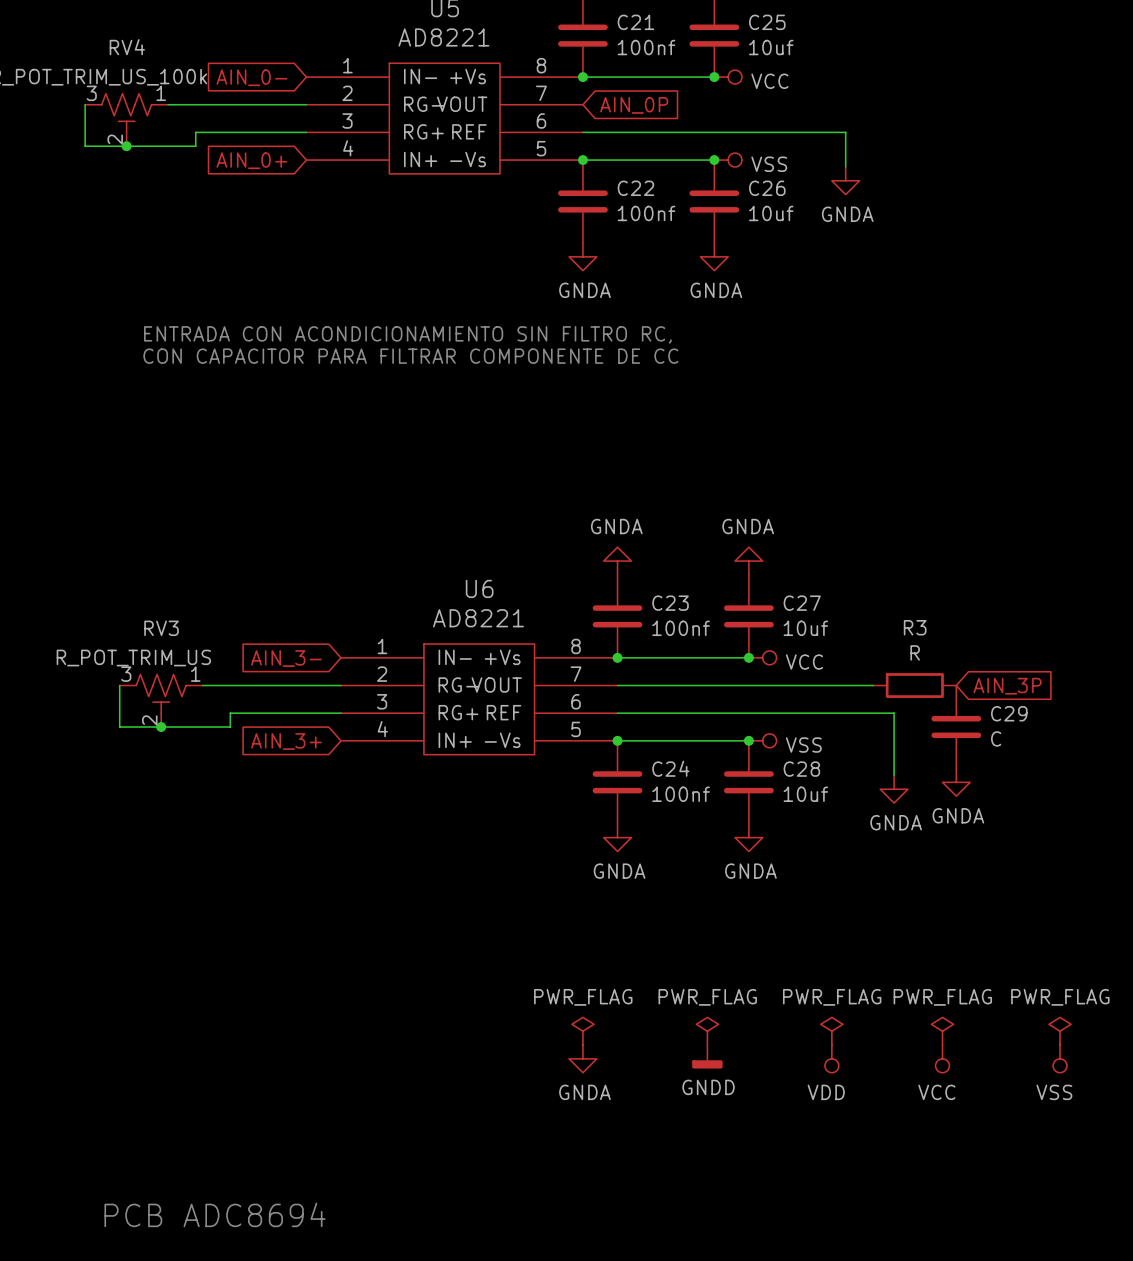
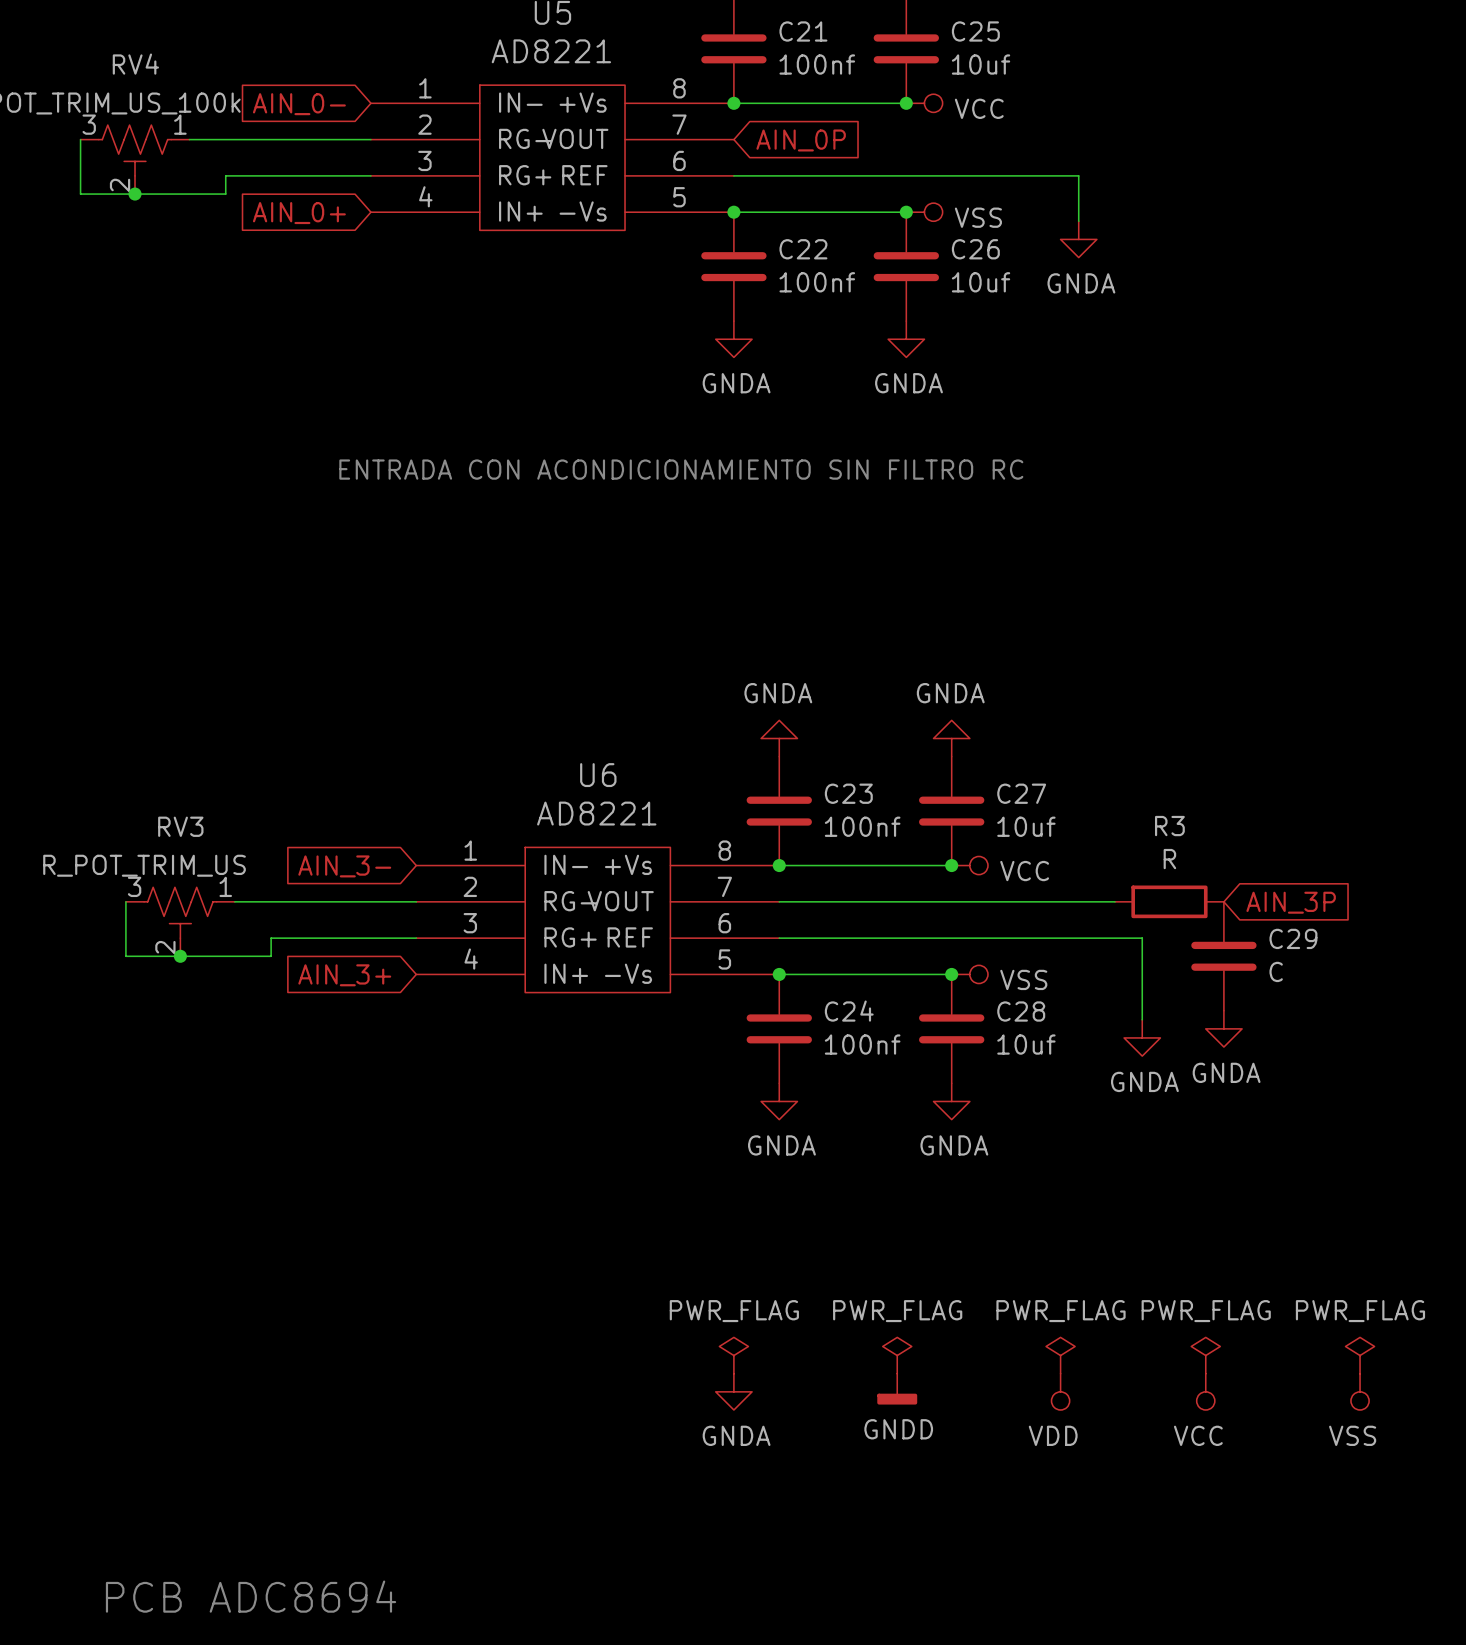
text: ENTRADA CON ACONDICIONAMIENTO SIN FILTRO RC, (407, 334) -> ENTRADA CON ACONDICIONAMIENTO SIN FILTRO RC (681, 469)
text: CON CAPACITOR PARA FILTRAR COMPONENTE DE CC (410, 356) -> none

